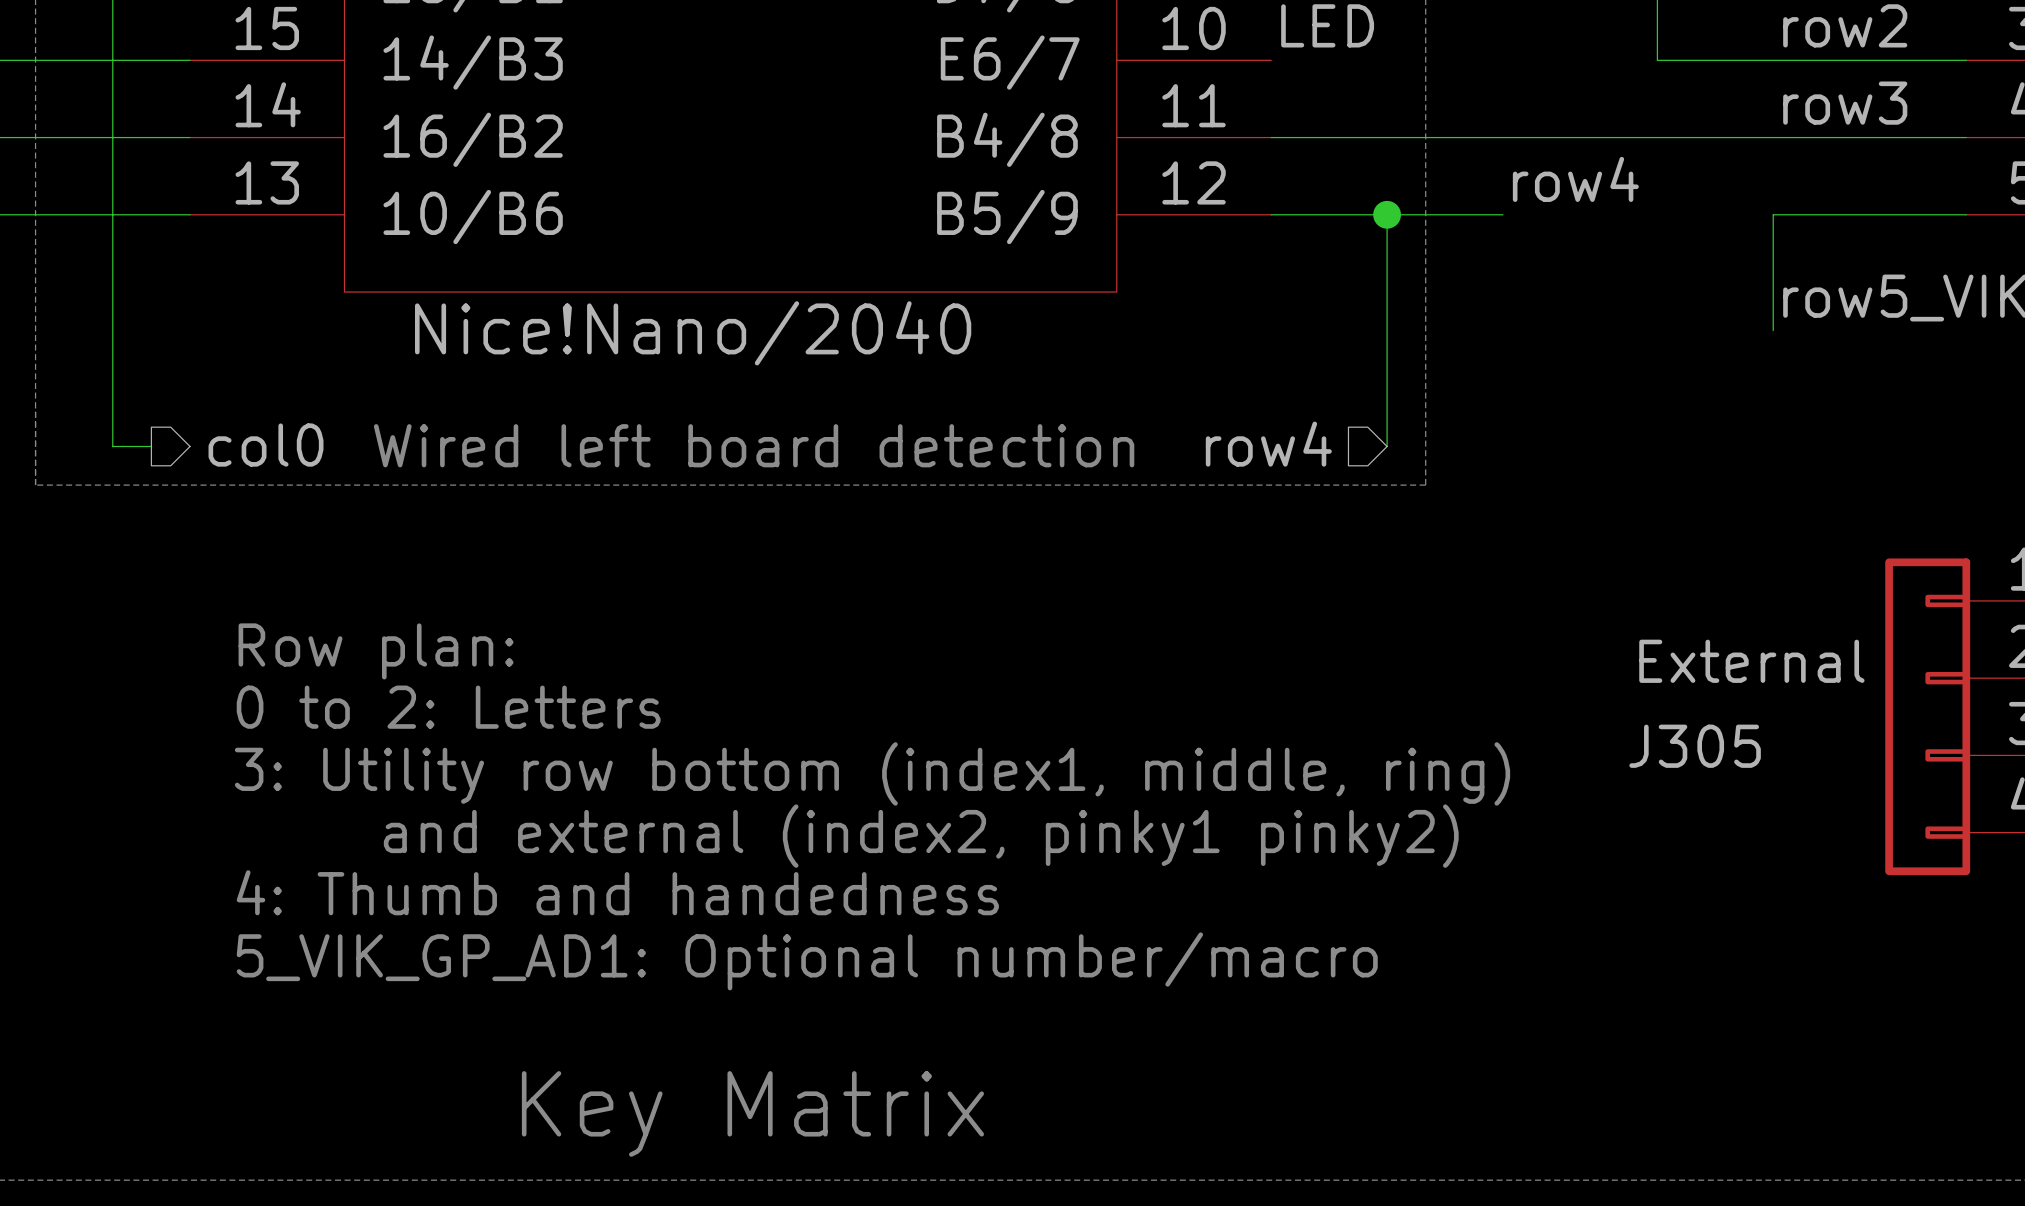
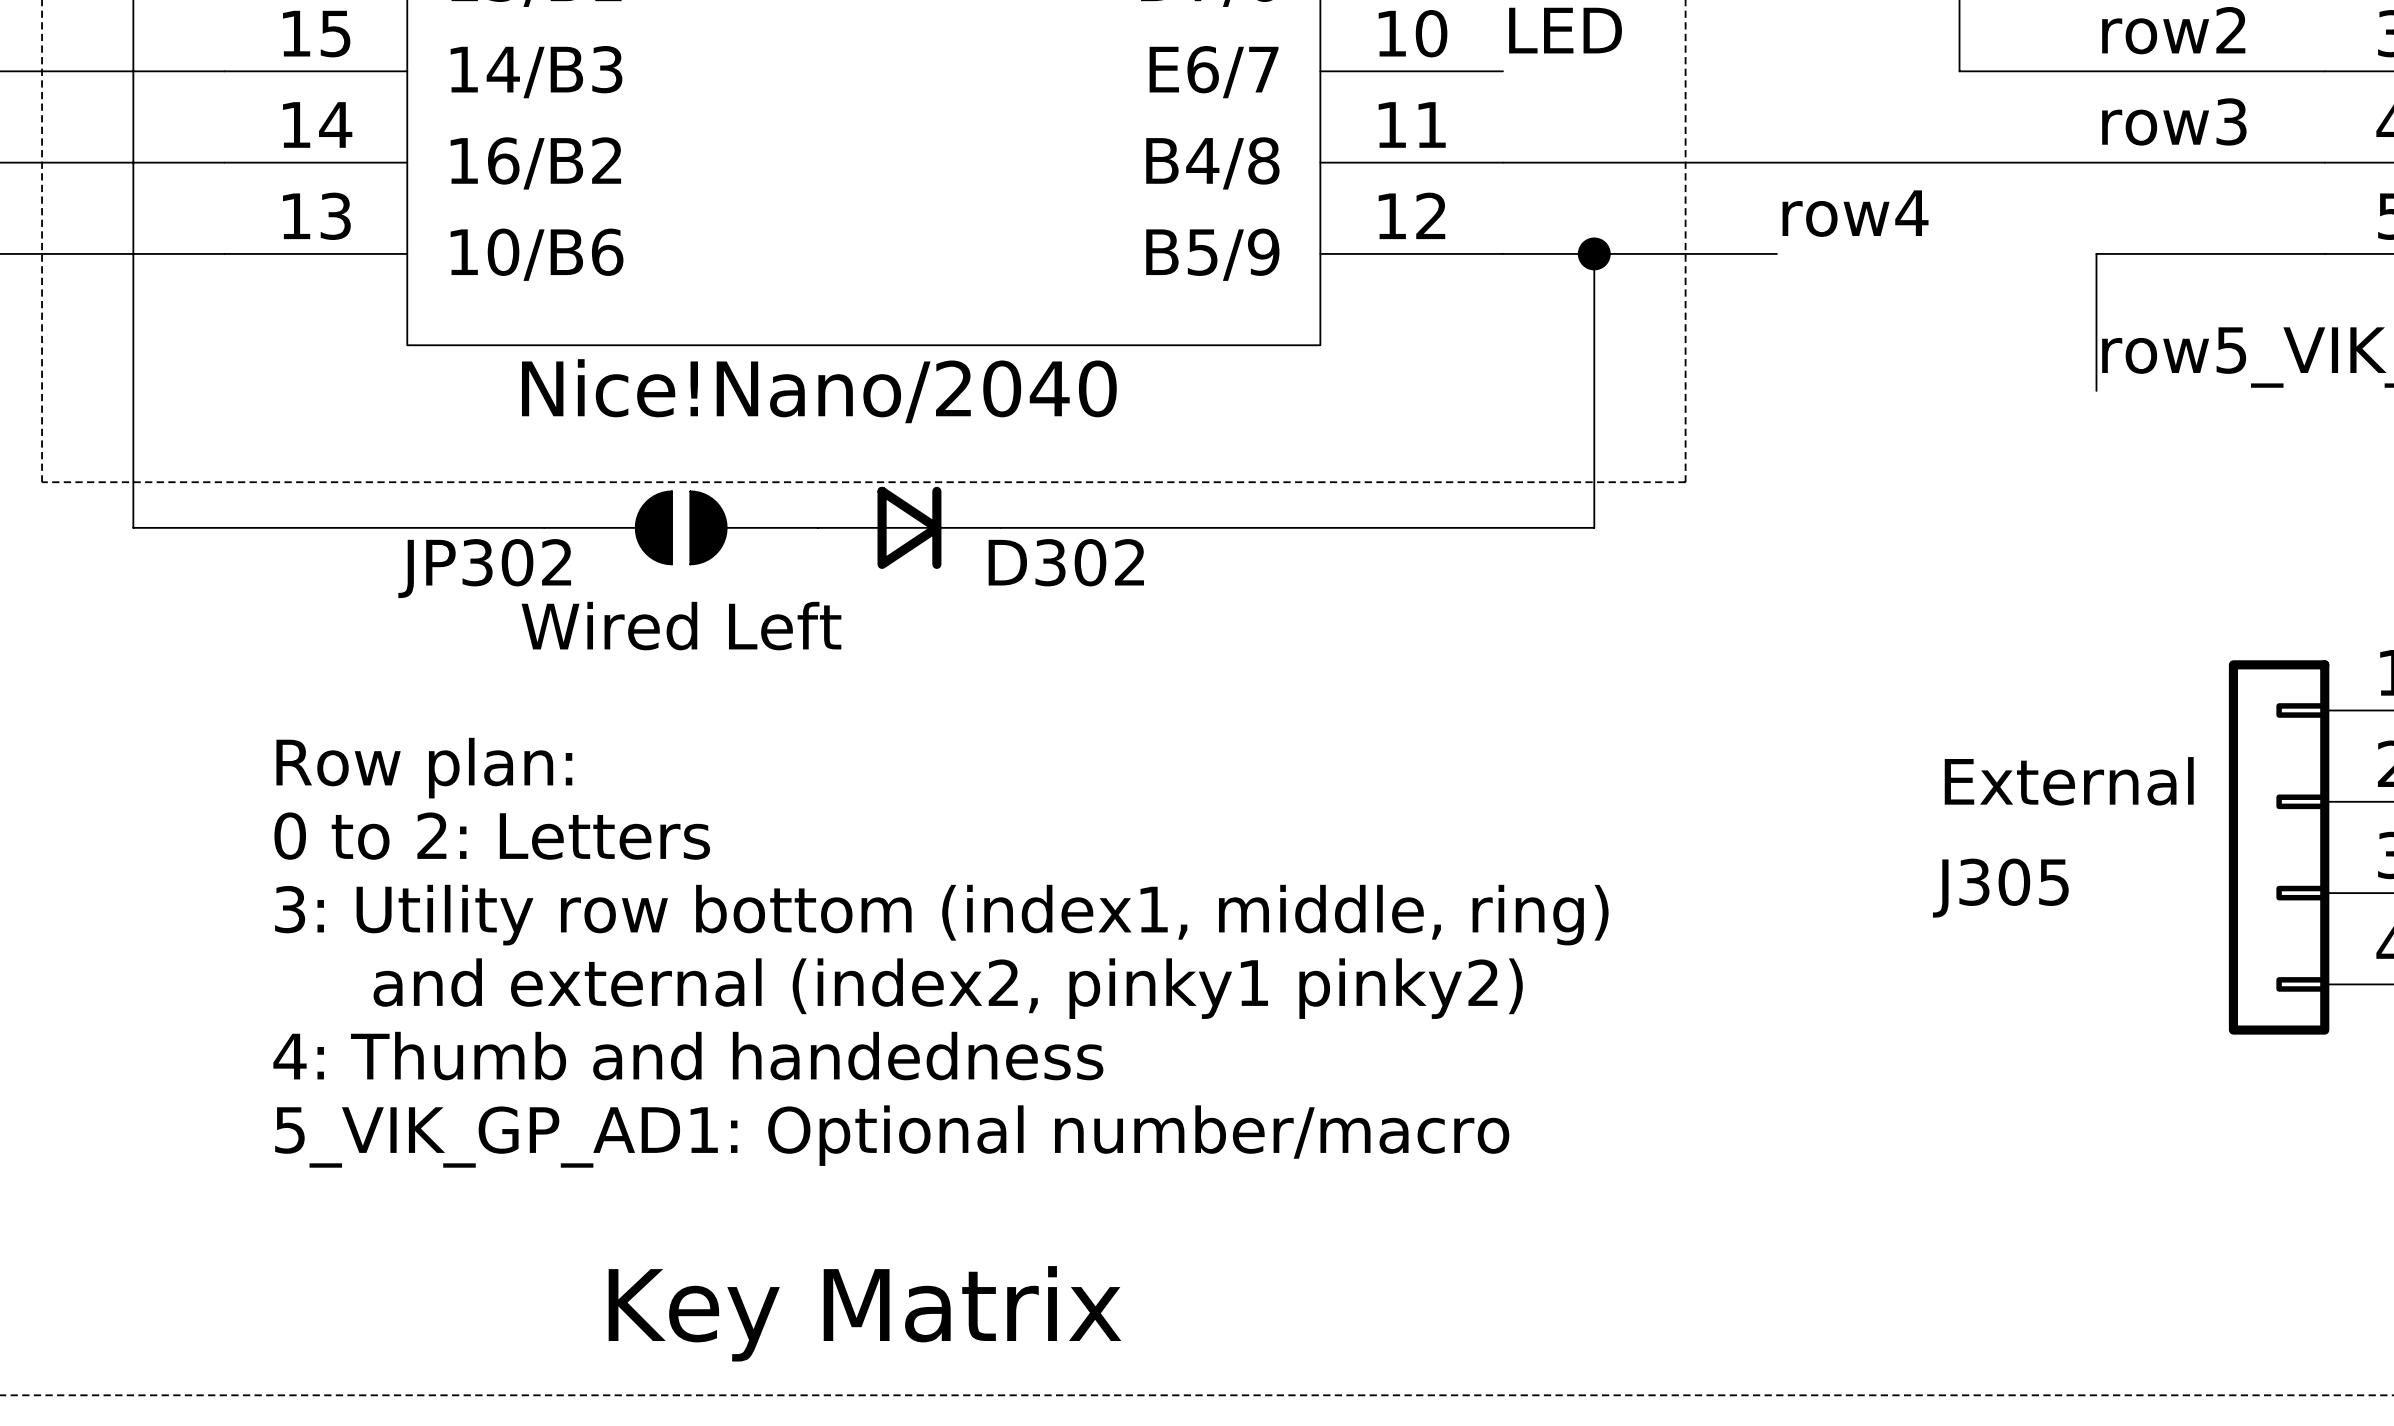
wire: none -> (1594, 253) (1594, 527) (1000, 527)
wire: (1387, 214) (1387, 446) -> none
junction position: (1387, 214) -> (1594, 253)
line: (35, 407) (35, 485) (1425, 485) (1425, 407) -> (42, 482) (1685, 482)
hierarchical label: row4 (1268, 444) -> none
hierarchical label: col0 (266, 445) -> none
text: Wired left board detection (754, 445) -> none
wire: none -> (179, 527) (544, 527)
JP302: none -> Wired Left (681, 527)
D302: none -> (909, 527)

